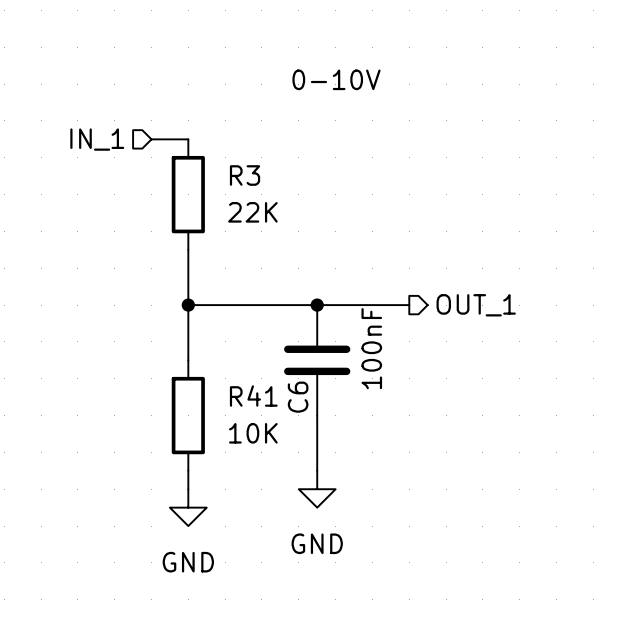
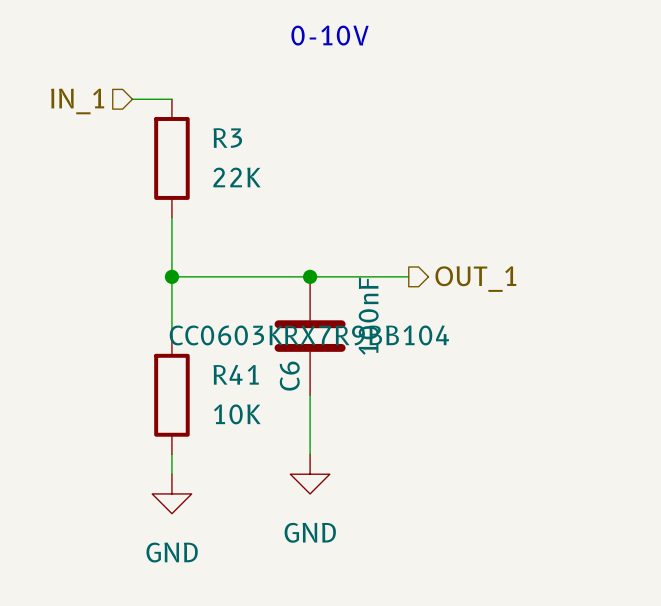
C6 text: none -> CC0603KRX7R9BB104 (309, 335)

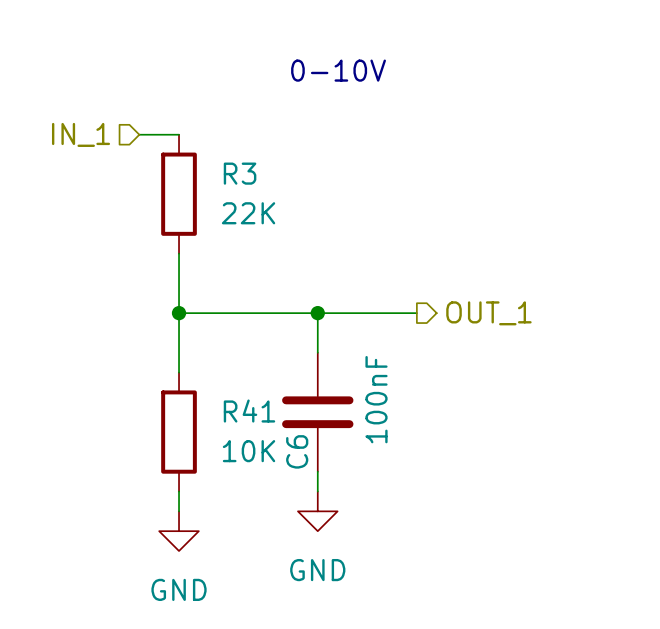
C6 text: CC0603KRX7R9BB104 (309, 335) -> none
C6 position: (310, 336) -> (317, 412)

